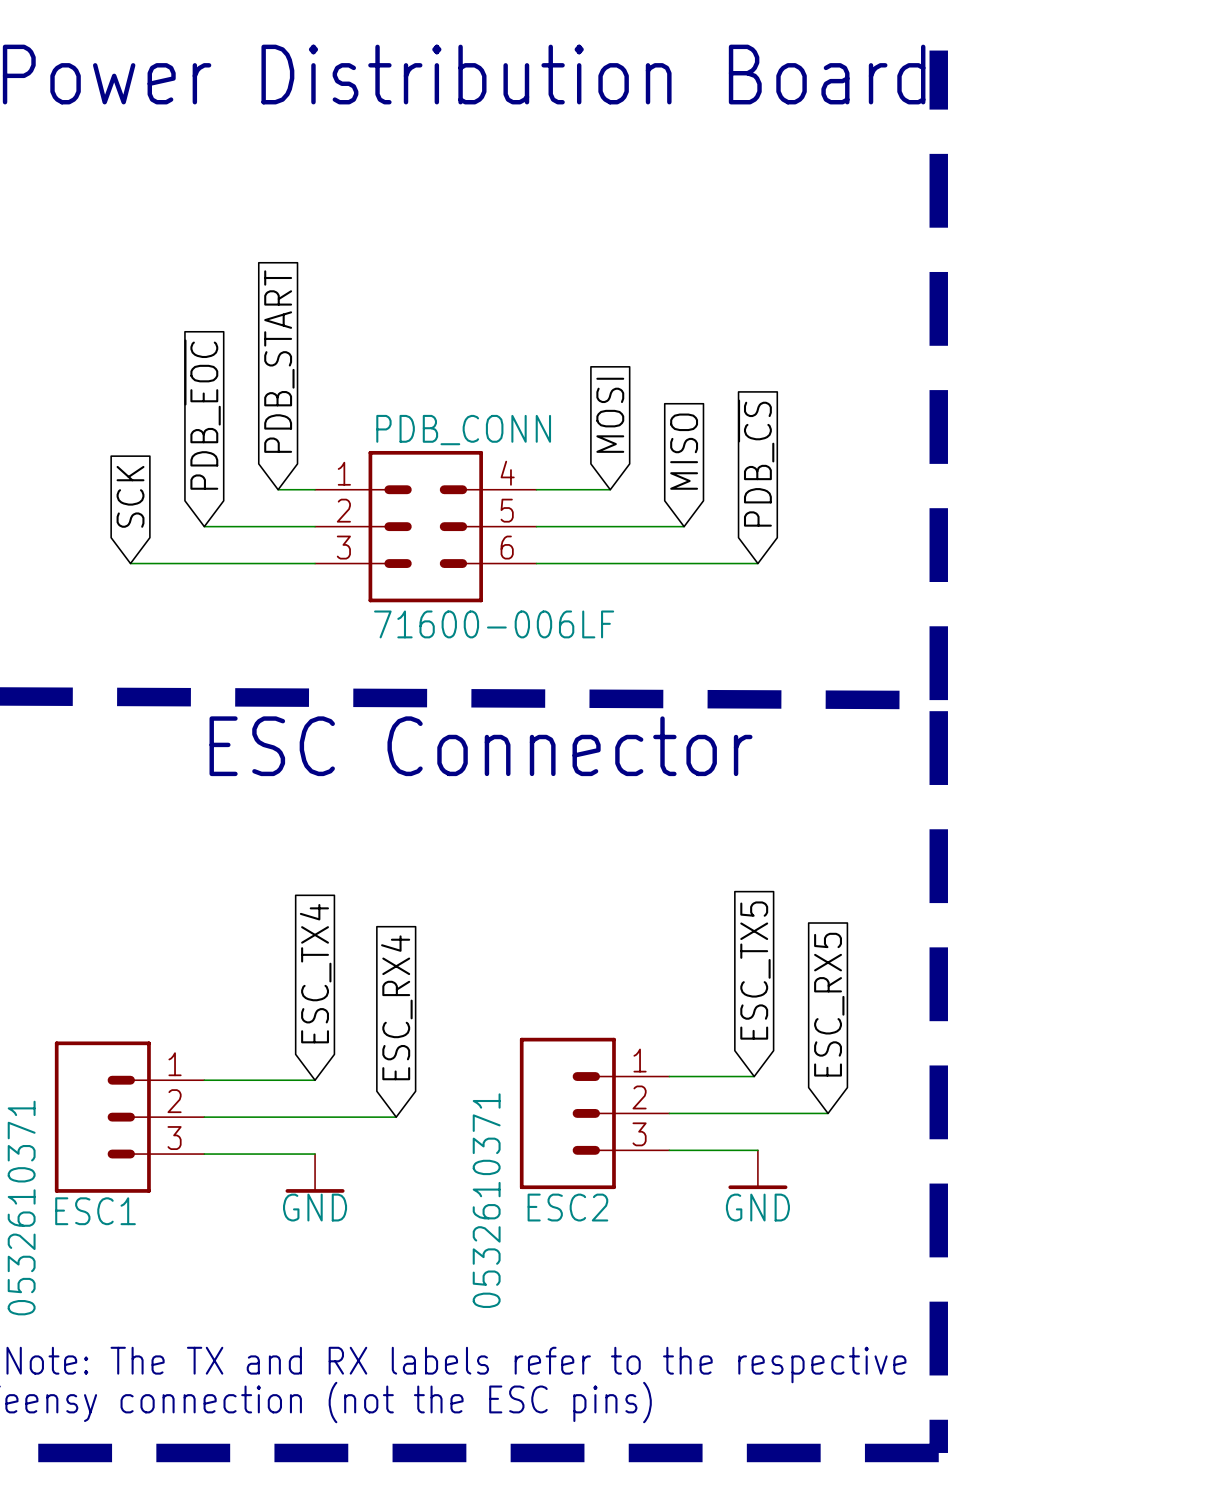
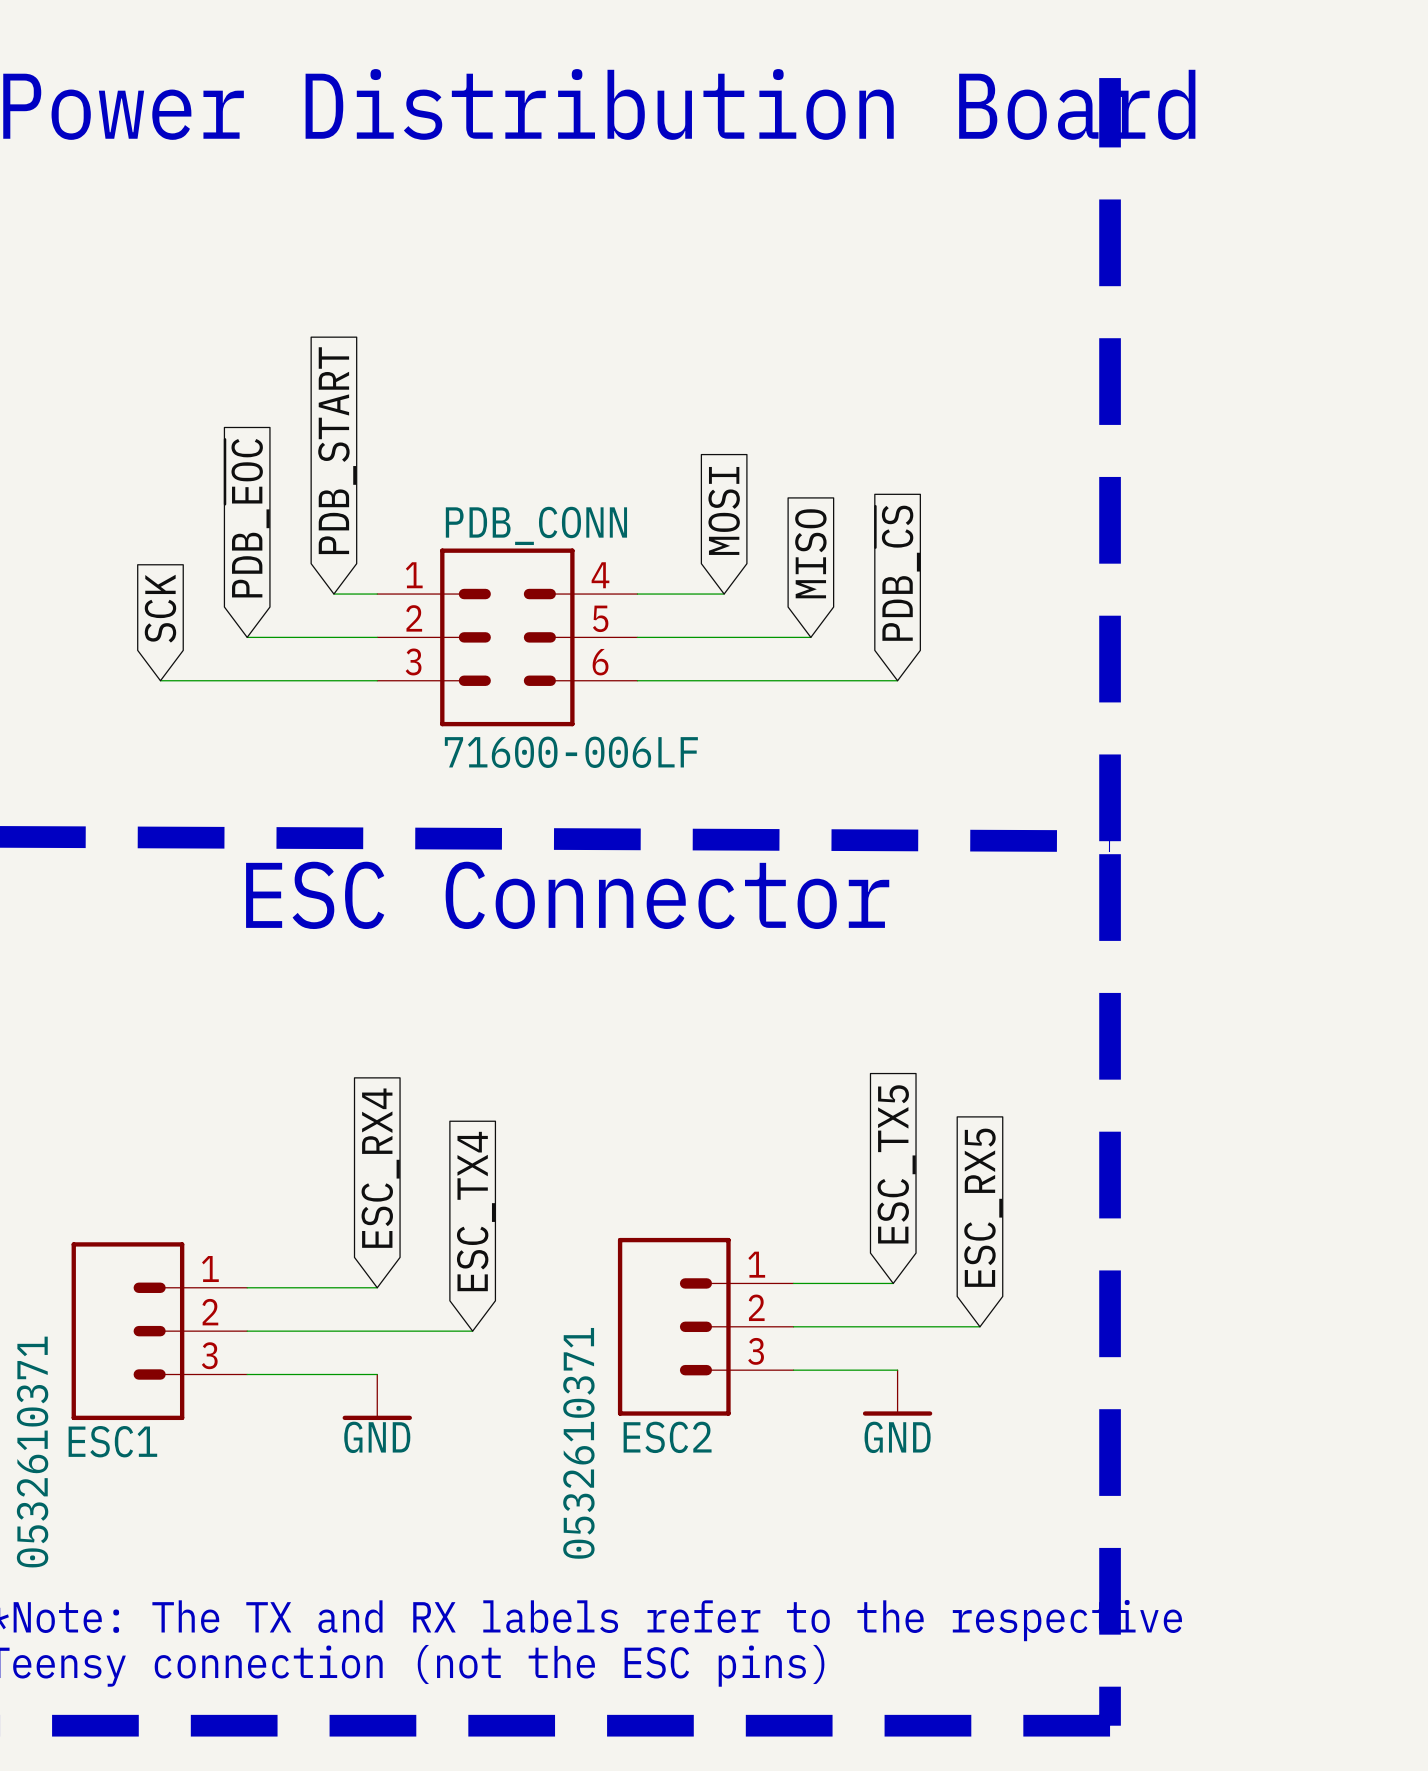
global label: ESC_TX4 (315, 973) -> ESC_RX4 (380, 1168)
global label: ESC_RX4 (396, 1007) -> ESC_TX4 (476, 1211)

